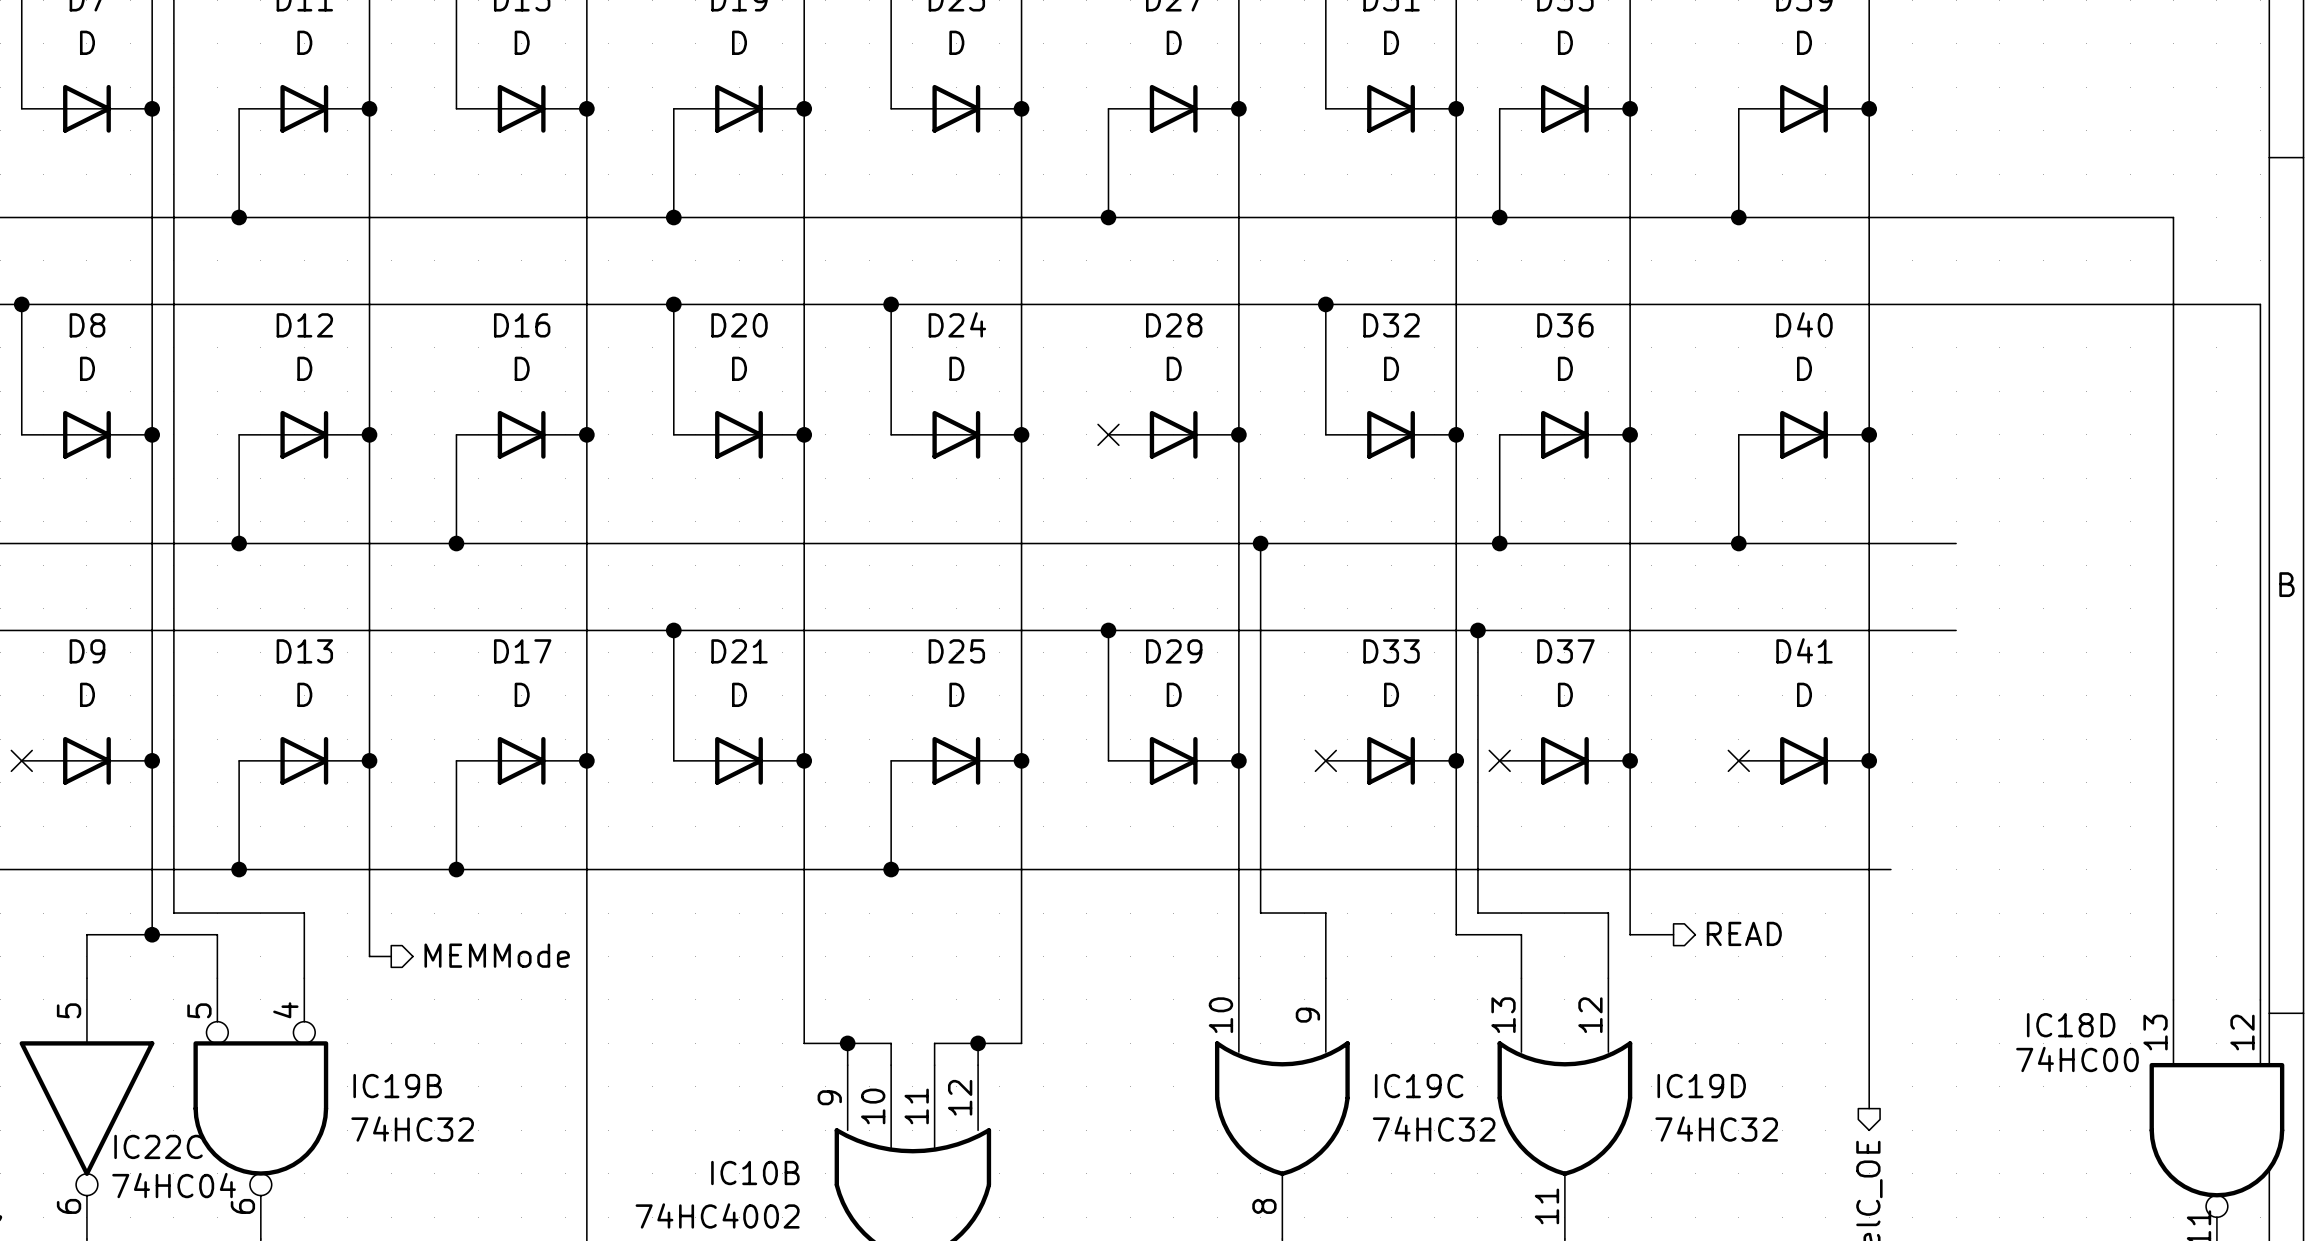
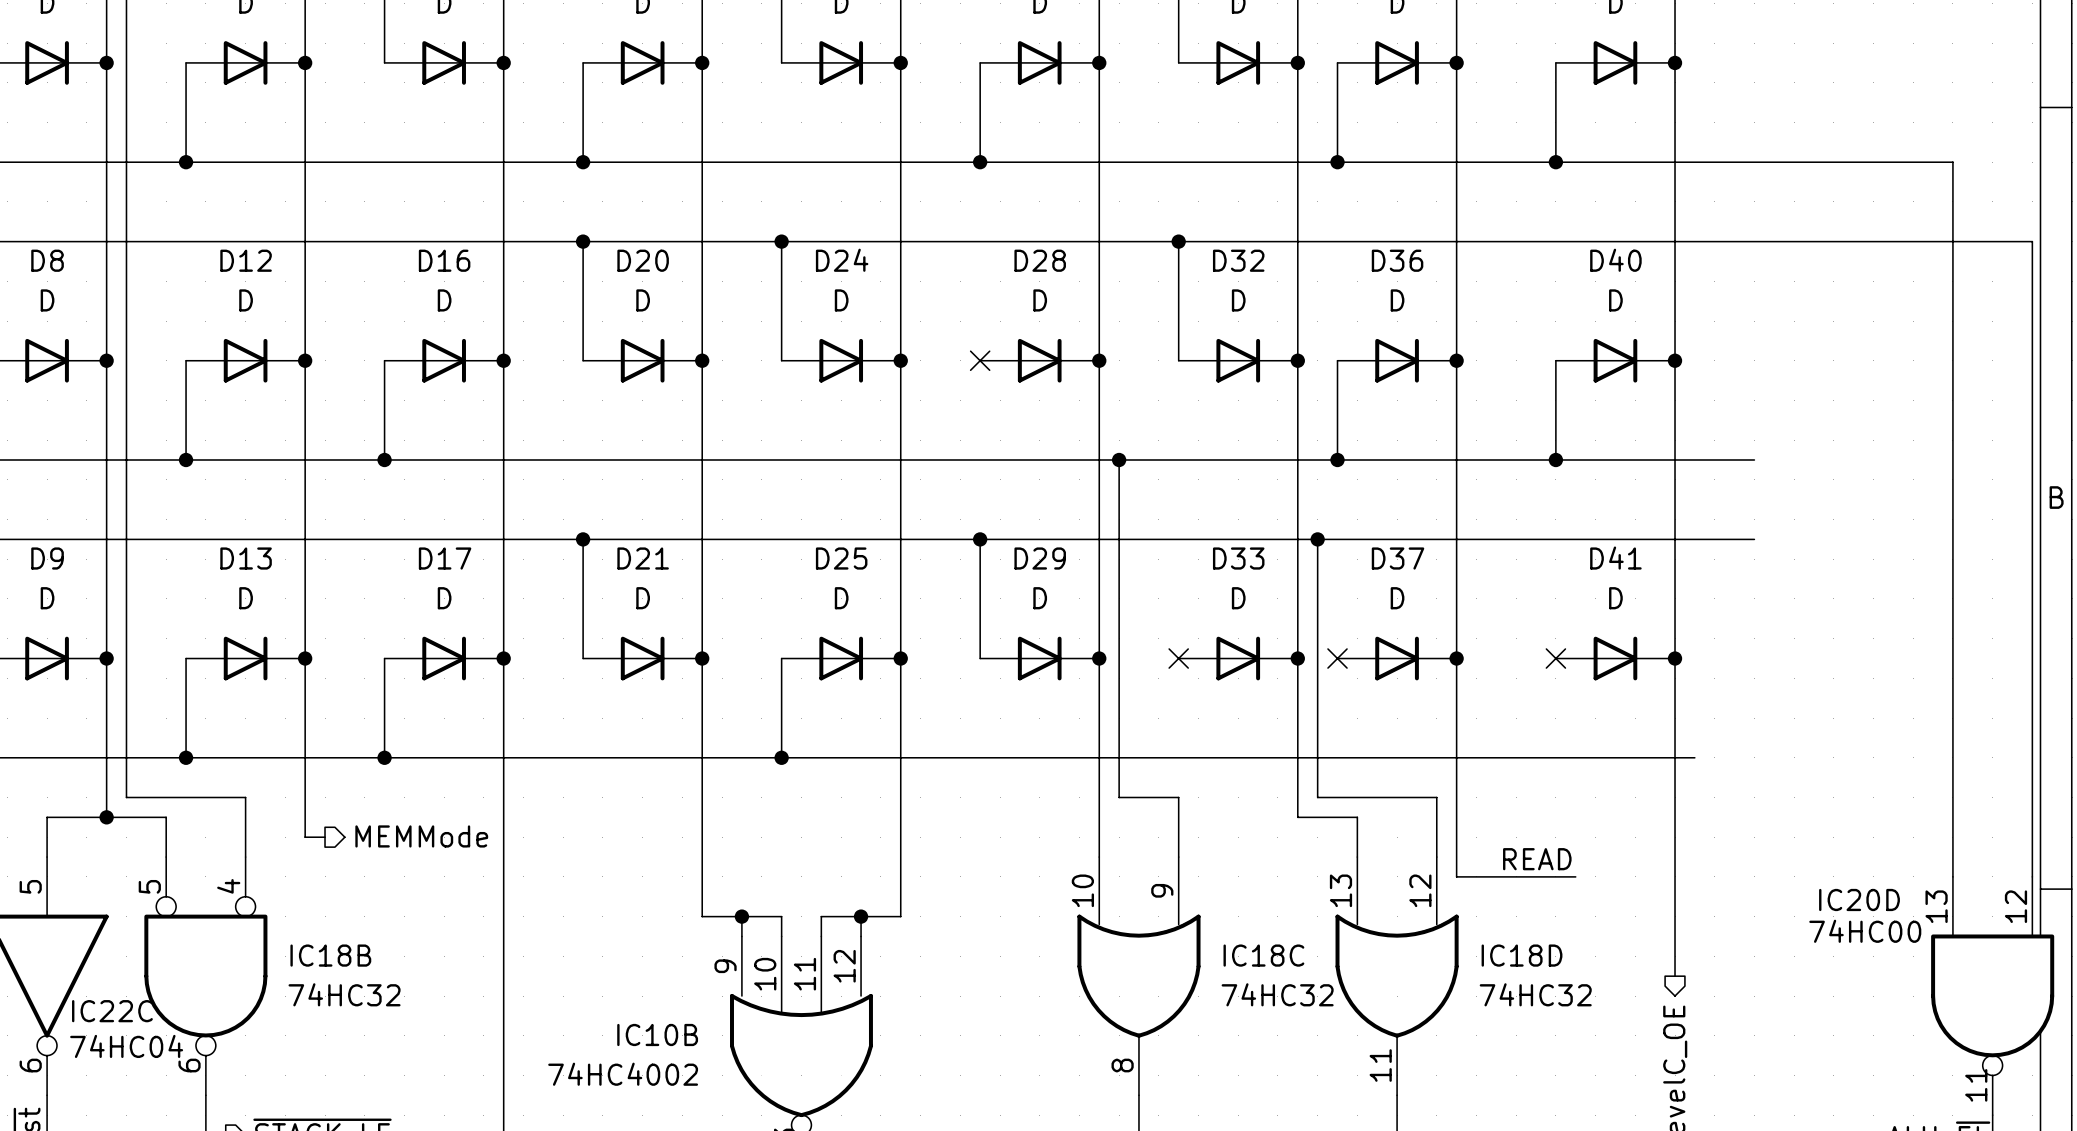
hierarchical label: READ (1744, 933) -> none
wire: (1630, 934) (1673, 934) -> (1456, 817) (1456, 876) (1575, 876)
label: none -> READ (1537, 859)
IC18D name: IC18D (2071, 1025) -> IC20D (1859, 899)
IC19B name: IC19B (397, 1086) -> IC18B (330, 955)
IC19C name: IC19C (1419, 1086) -> IC18C (1263, 955)
IC19D name: IC19D (1701, 1086) -> IC18D (1522, 955)

